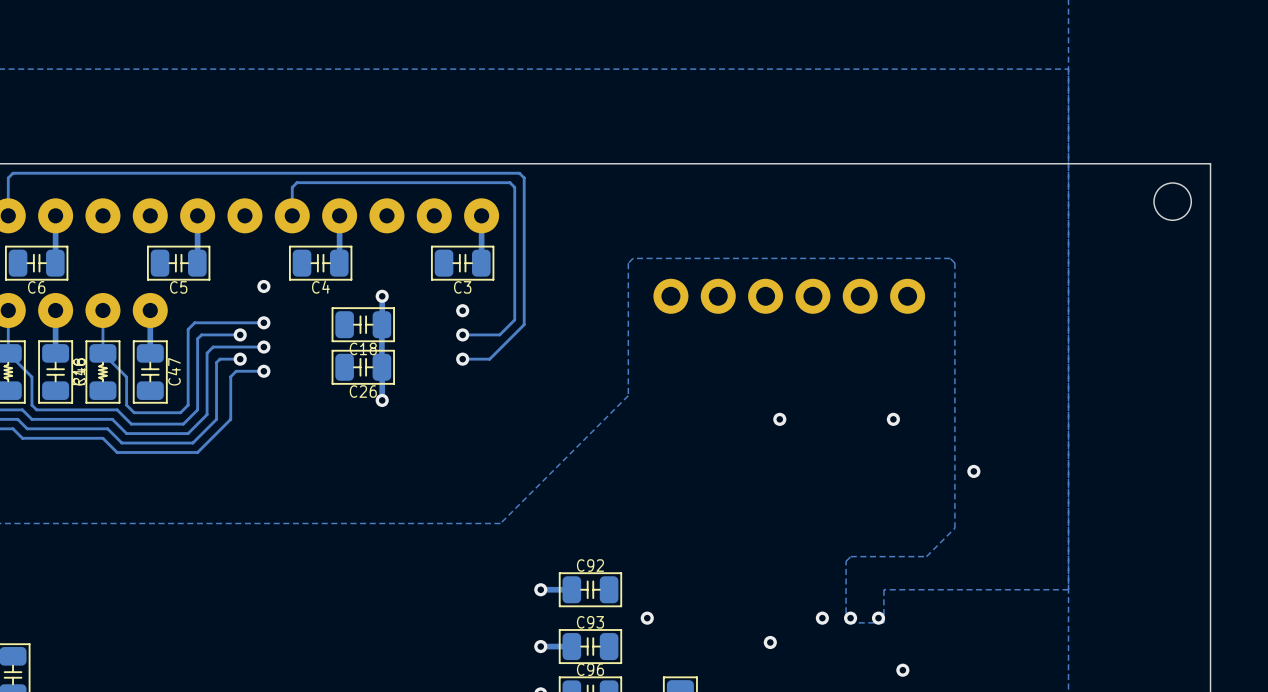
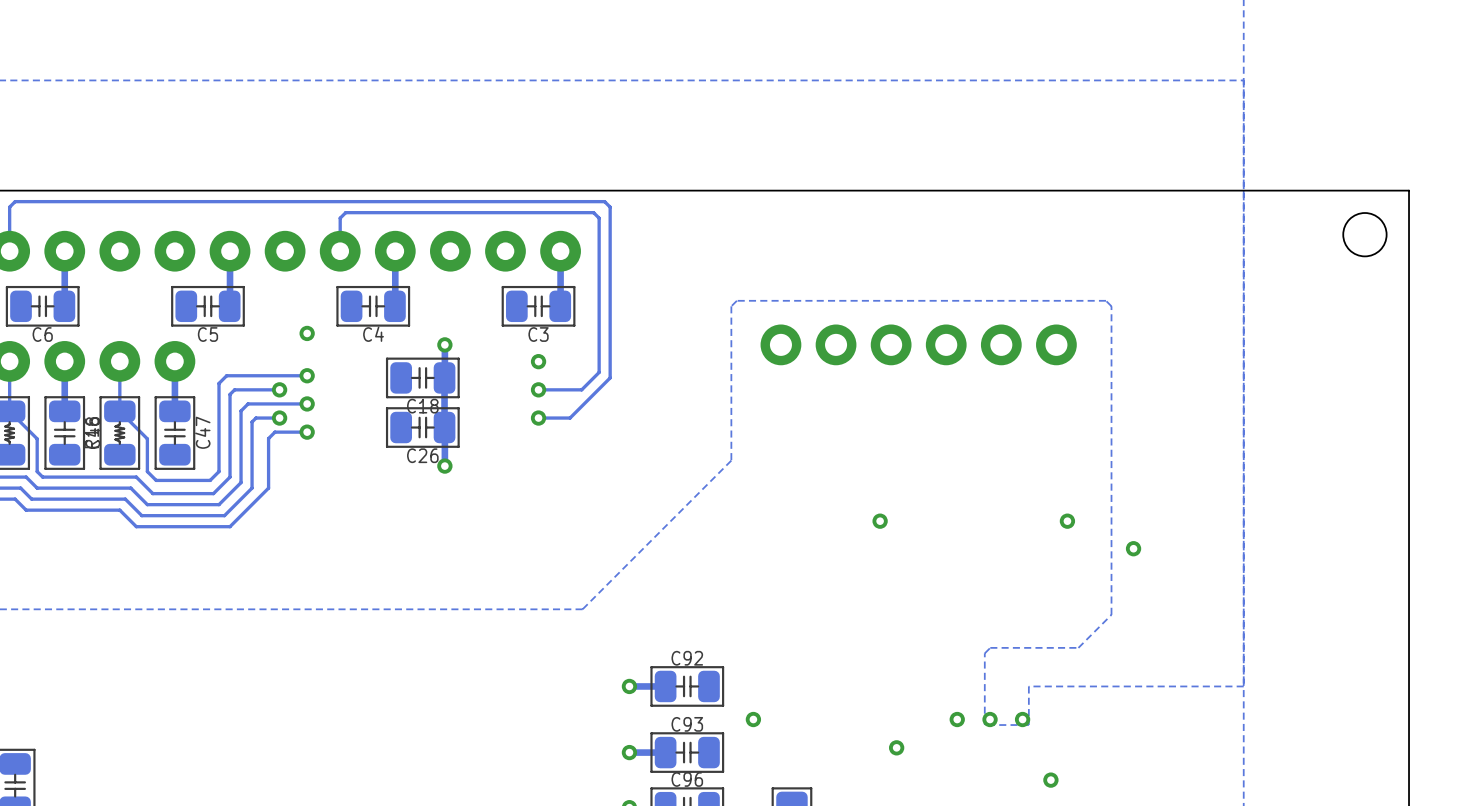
via position: (779, 419) -> (880, 521)
via position: (893, 419) -> (1067, 521)

